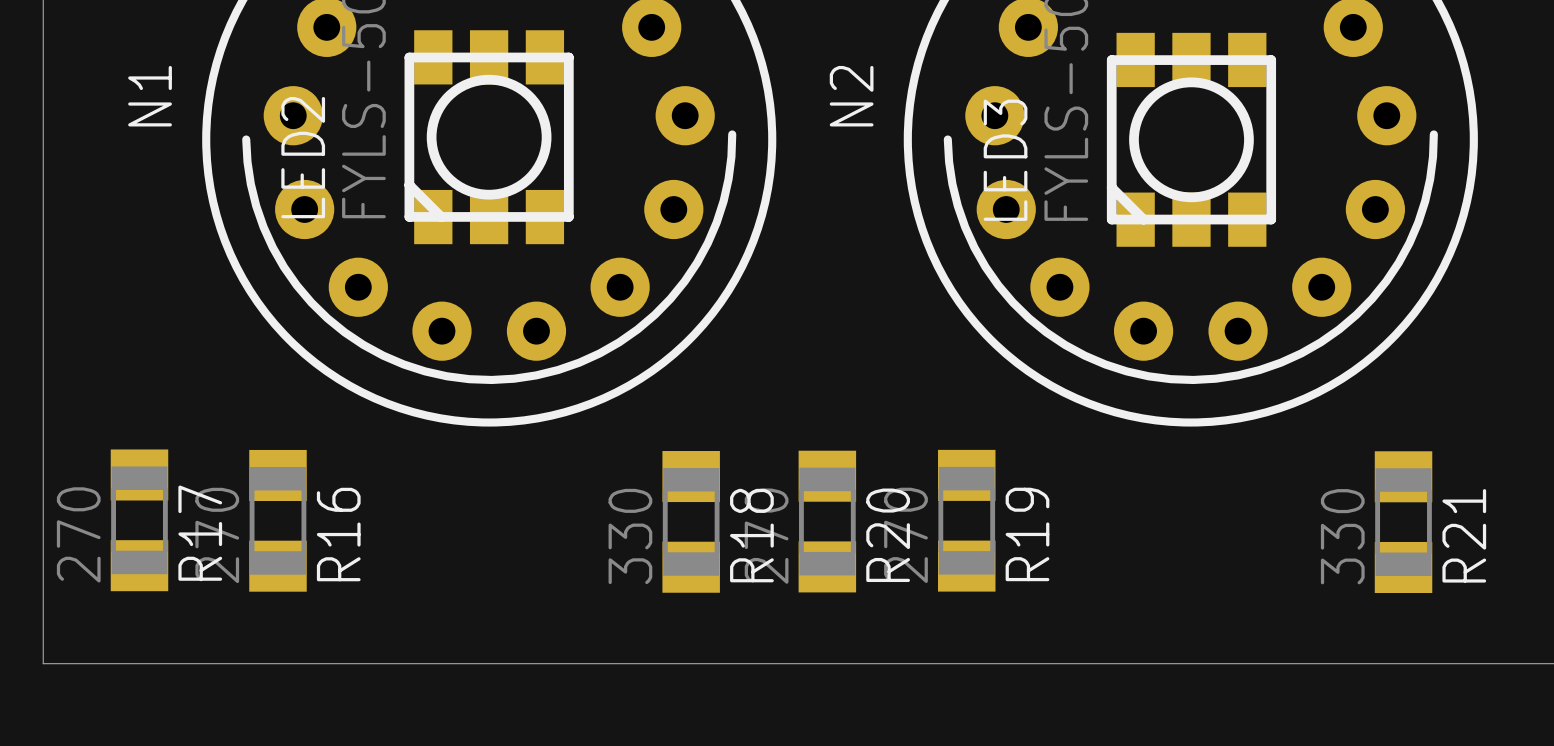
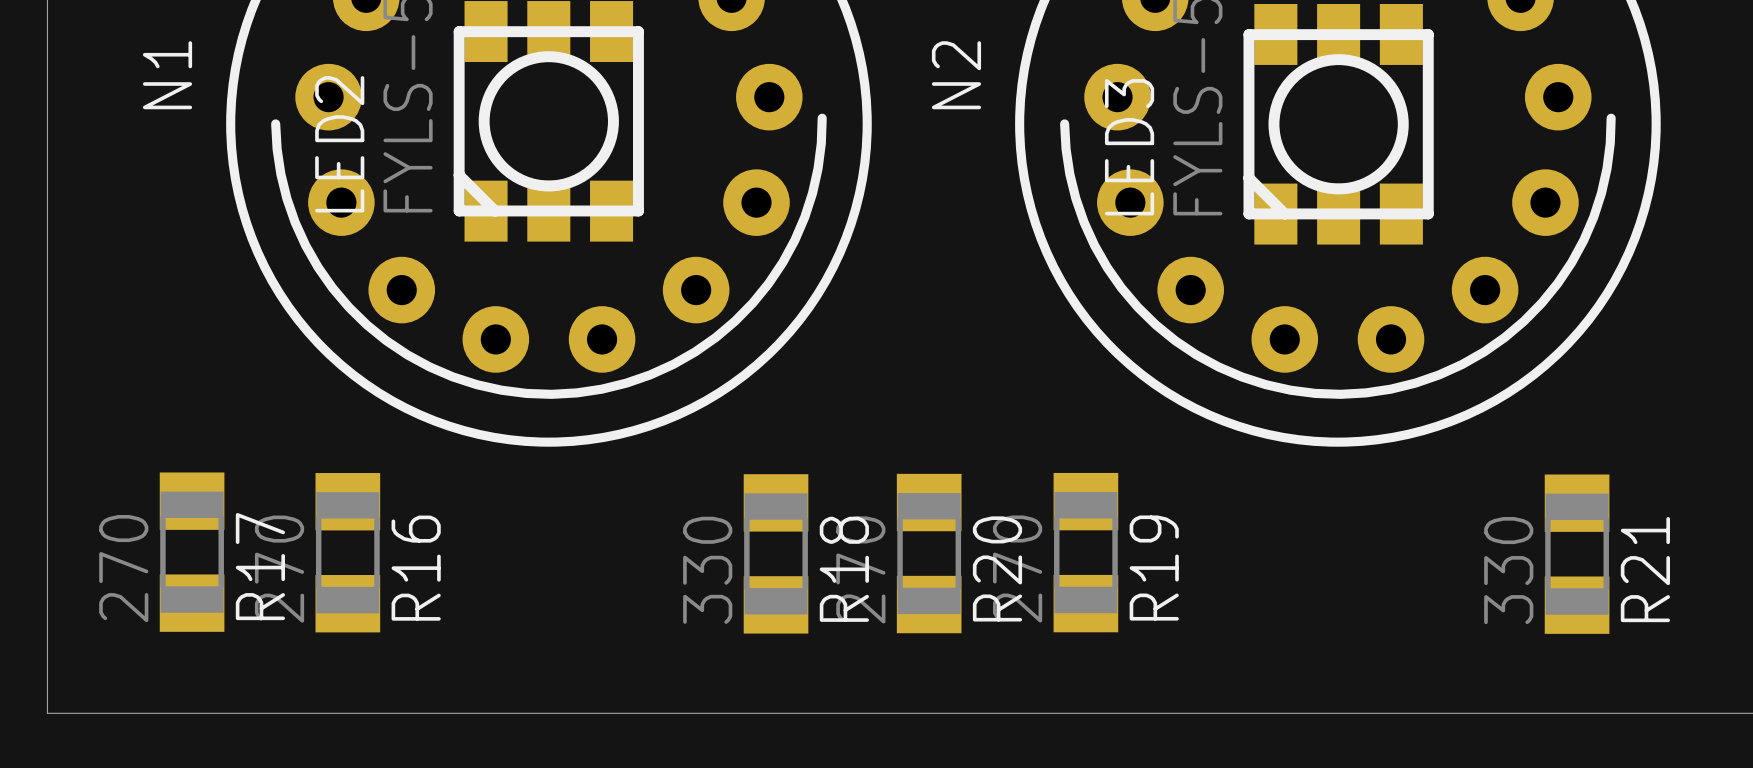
R17 position: (139, 520) -> (192, 552)
R16 position: (277, 520) -> (347, 552)

